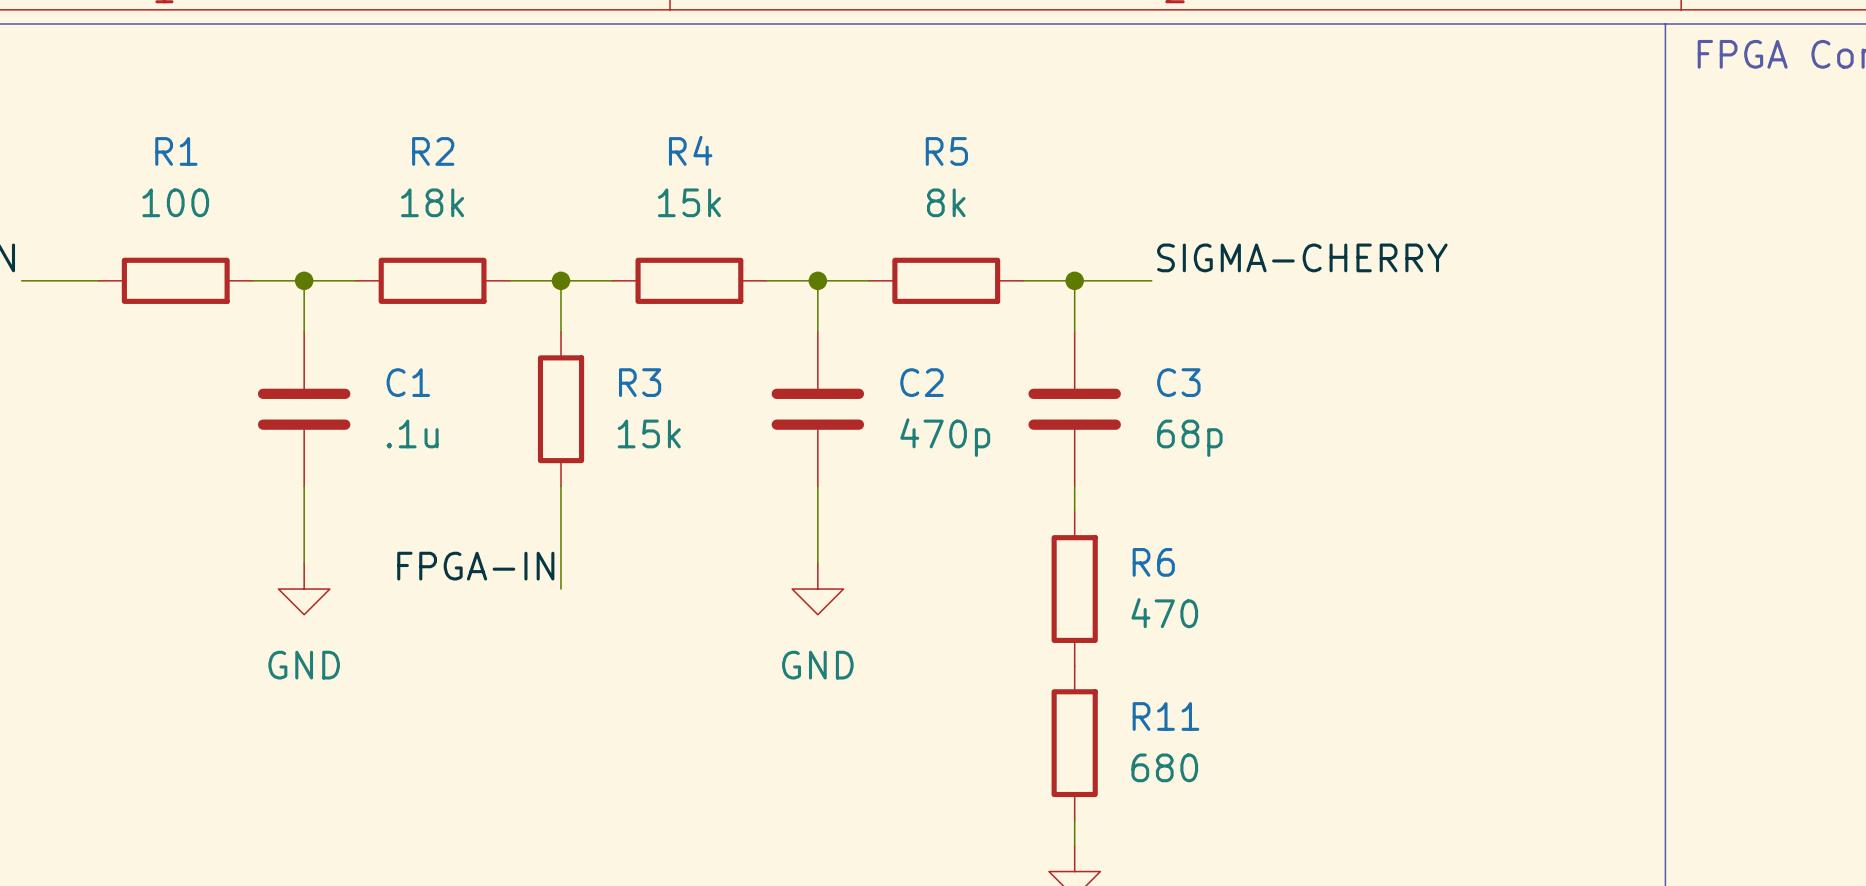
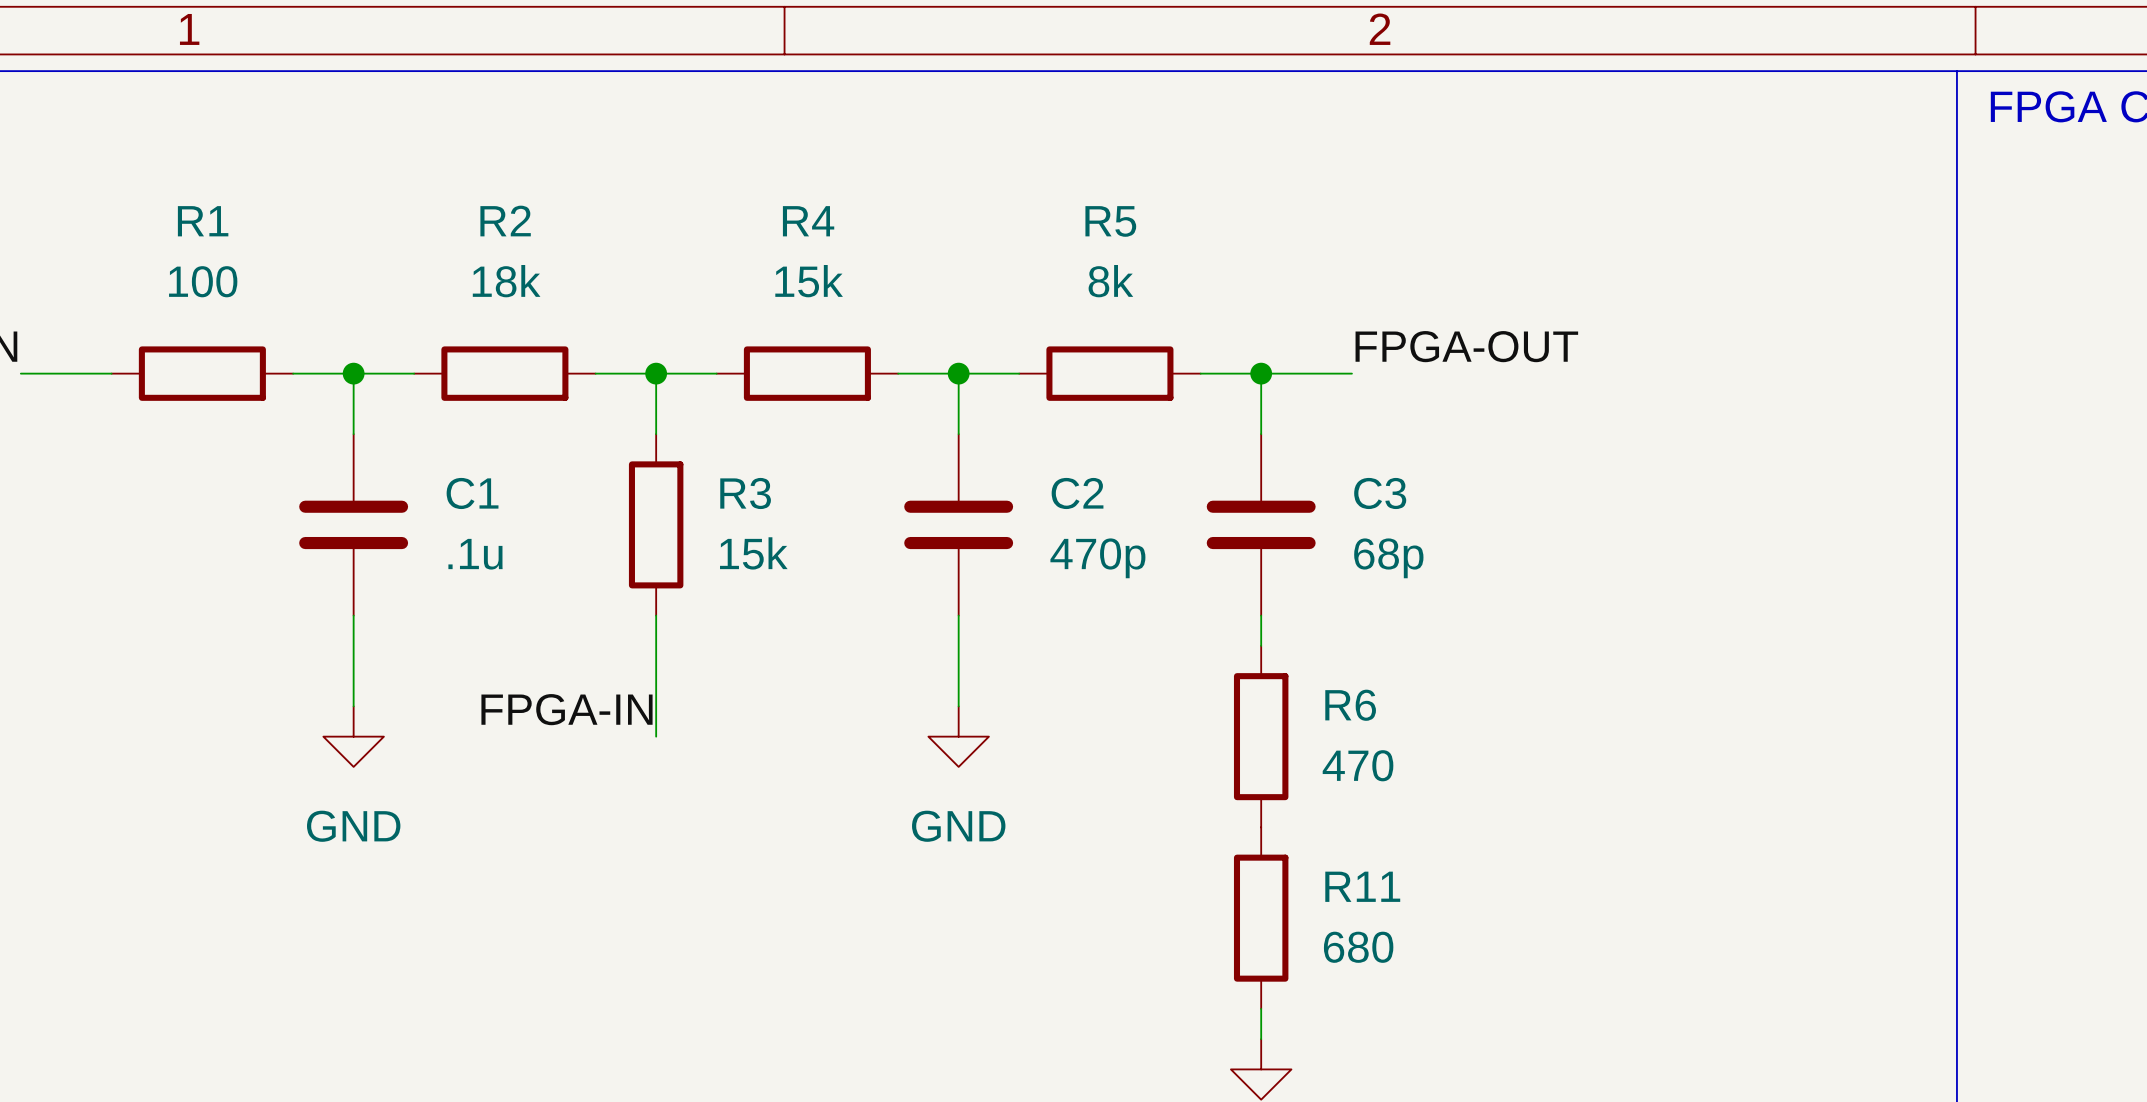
label: SIGMA-CHERRY (1302, 257) -> FPGA-OUT (1466, 346)

